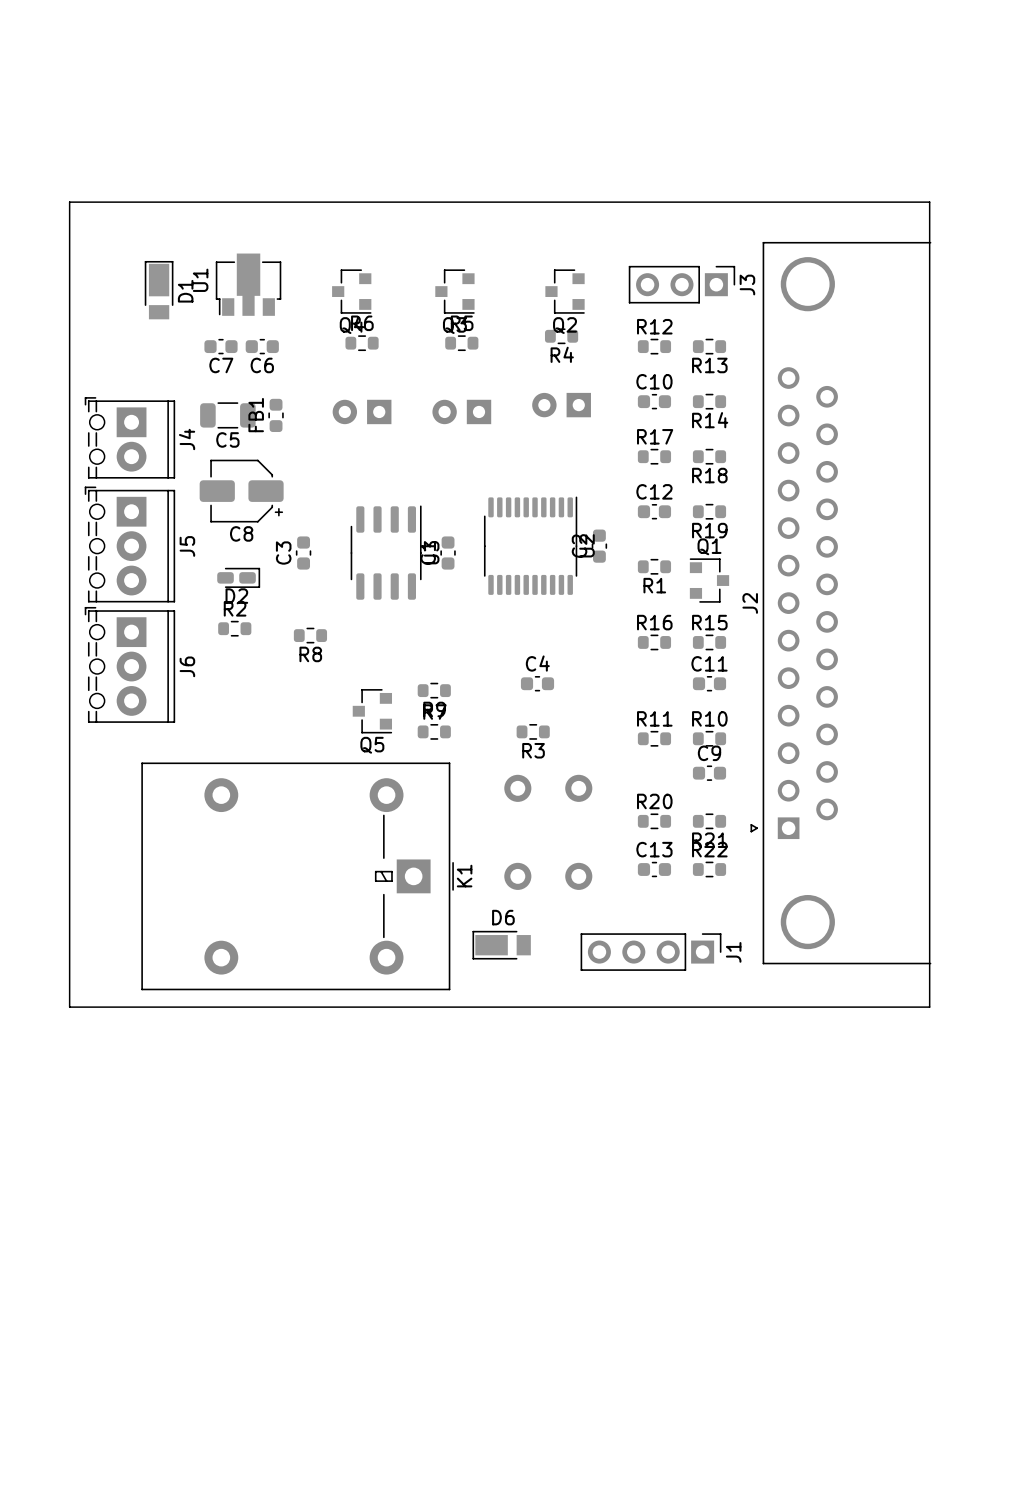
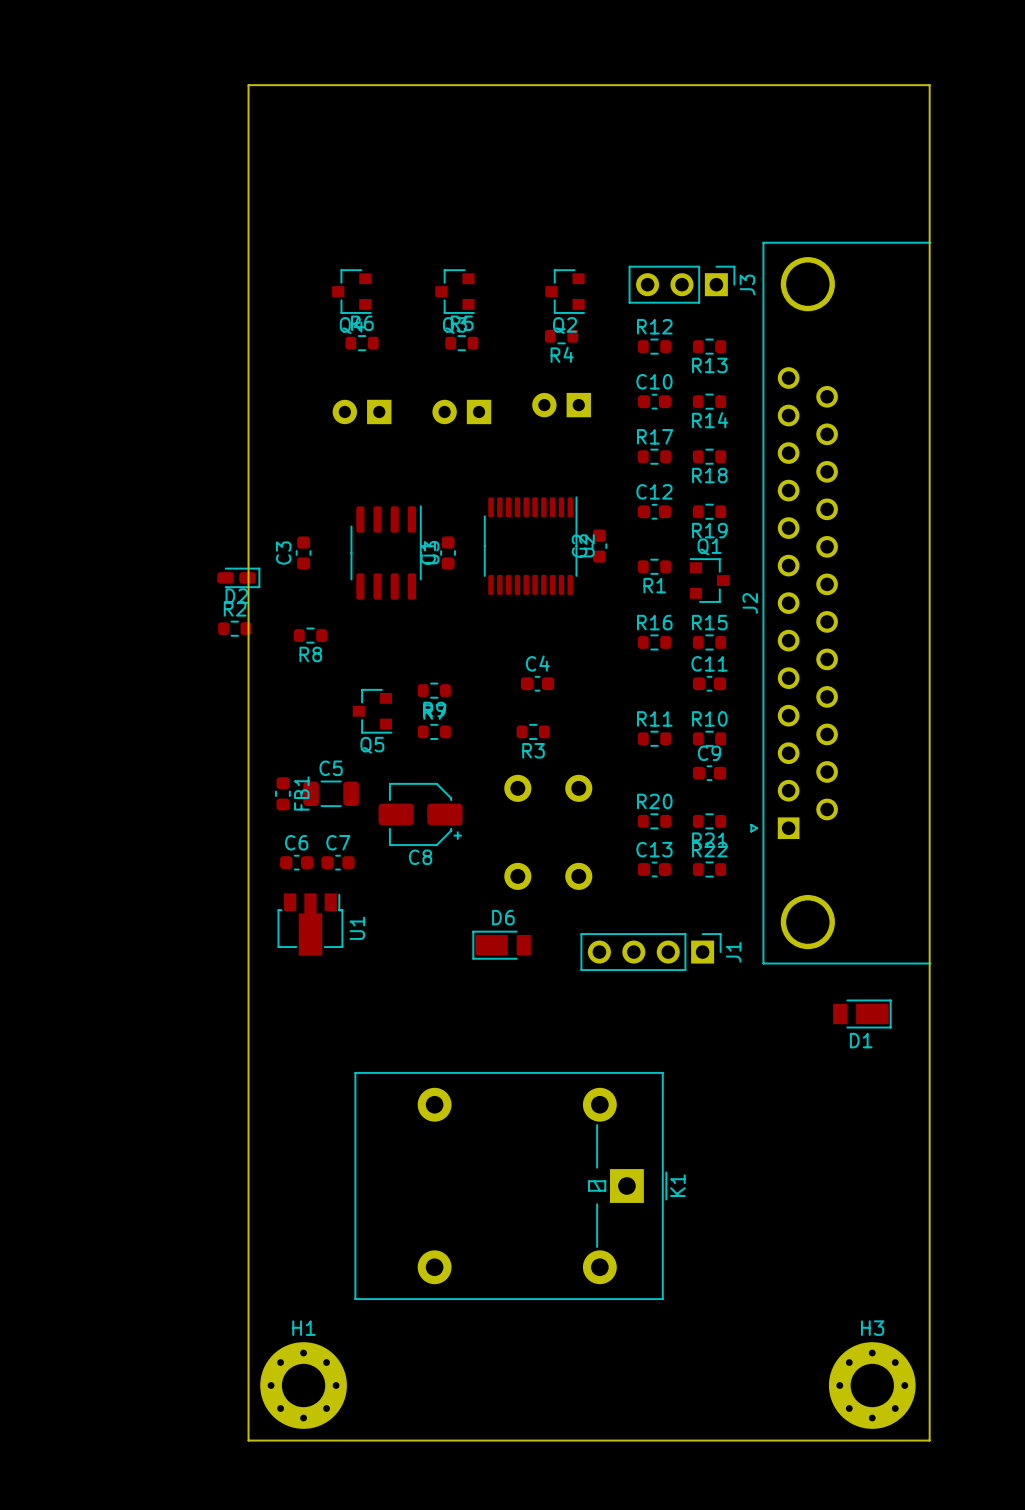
board edge: (929, 202) (69, 202) (69, 1007) (929, 1007) -> (929, 202) (929, 85) (248, 85) (248, 1440) (929, 1440) (929, 1007)
U1 rotation: 0° (248, 284) -> 180° (310, 924)
U1 position: (248, 284) -> (310, 924)
D1 rotation: 0° (159, 290) -> 90° clockwise (862, 1013)
D1 position: (159, 290) -> (862, 1013)
C7 position: (221, 346) -> (337, 862)
C6 position: (262, 346) -> (296, 862)
C7 name position: C7 (221, 365) -> C7 (338, 842)
C6 name position: C6 (262, 365) -> C6 (296, 842)
C5 position: (227, 415) -> (331, 793)
FB1 name position: FB1 (256, 415) -> FB1 (301, 793)
FB1 position: (276, 415) -> (282, 793)
J4: (129, 437) -> none
C5 name position: C5 (227, 439) -> C5 (331, 768)
C8 position: (241, 491) -> (420, 814)
J5: (129, 544) -> none
J6: (129, 664) -> none
K1 position: (297, 876) -> (510, 1185)
H1: none -> (303, 1385)
H3: none -> (872, 1385)

